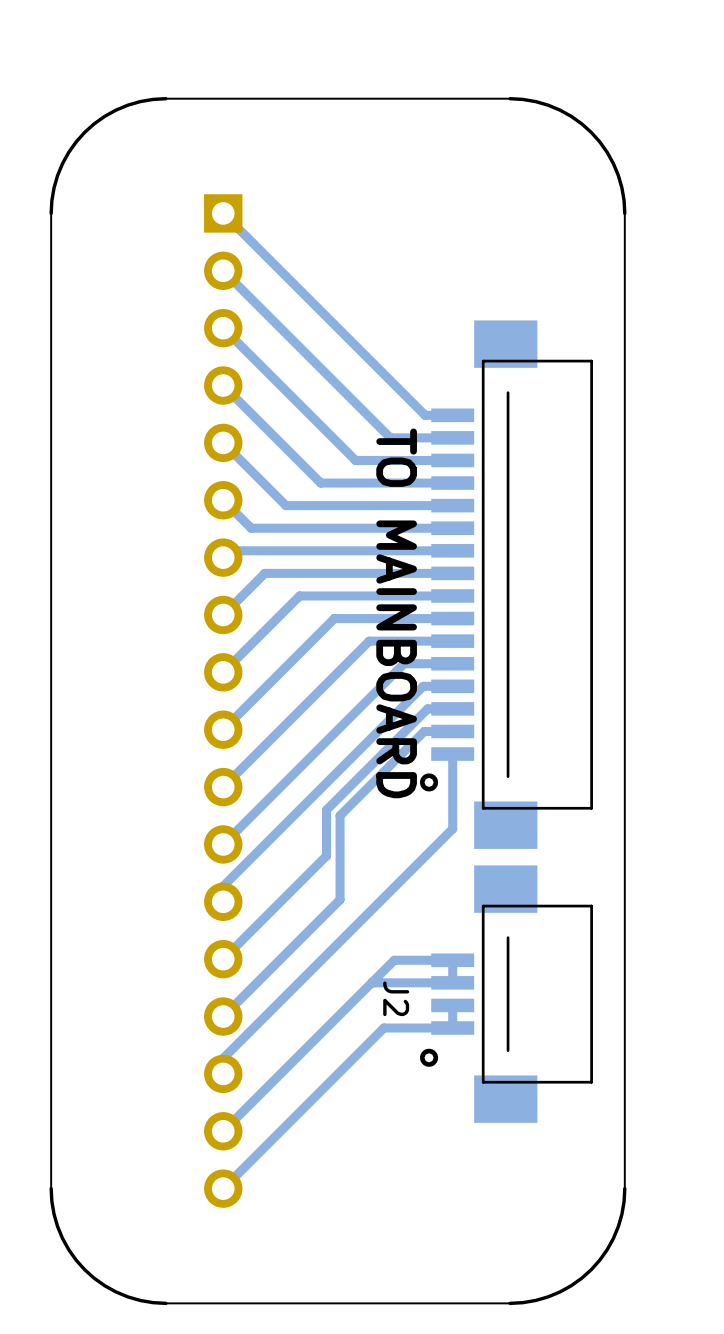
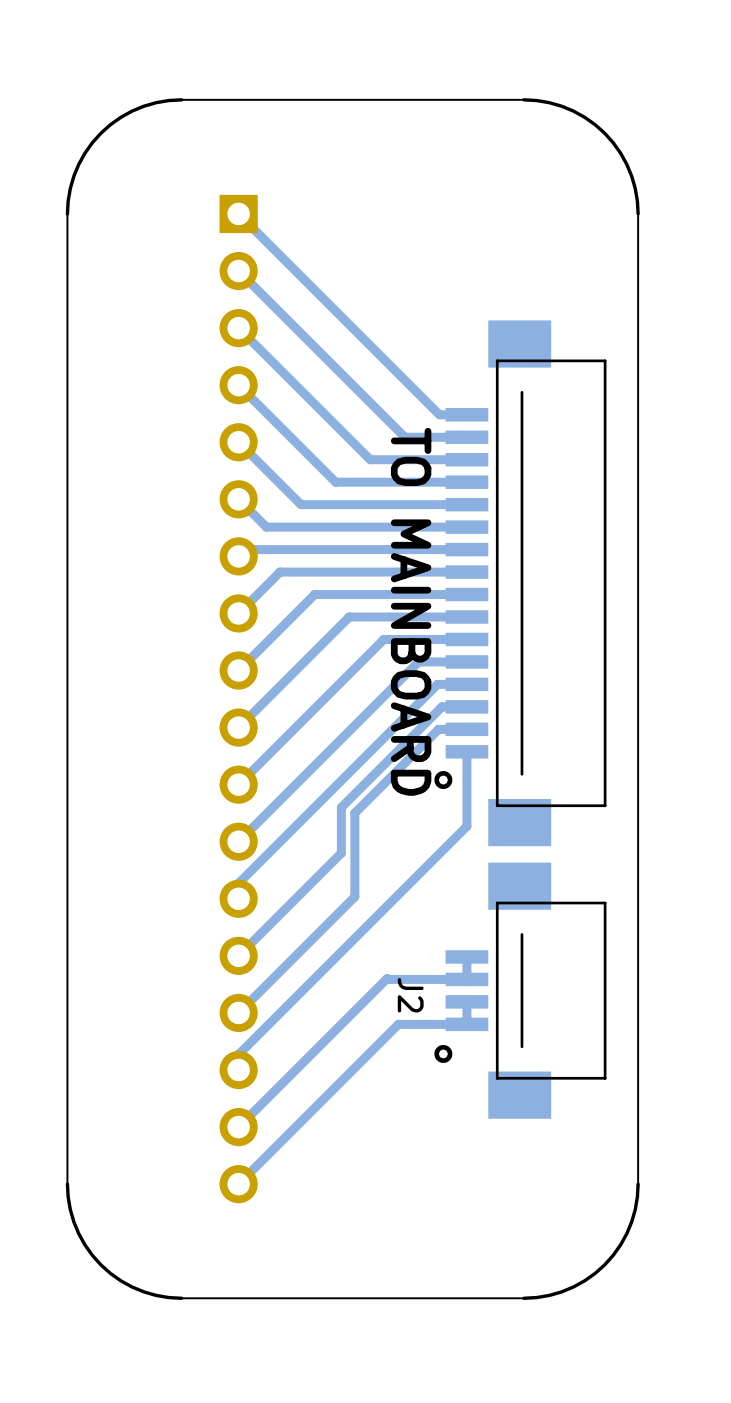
track: (452, 960) (394, 960) (372, 982) -> none

